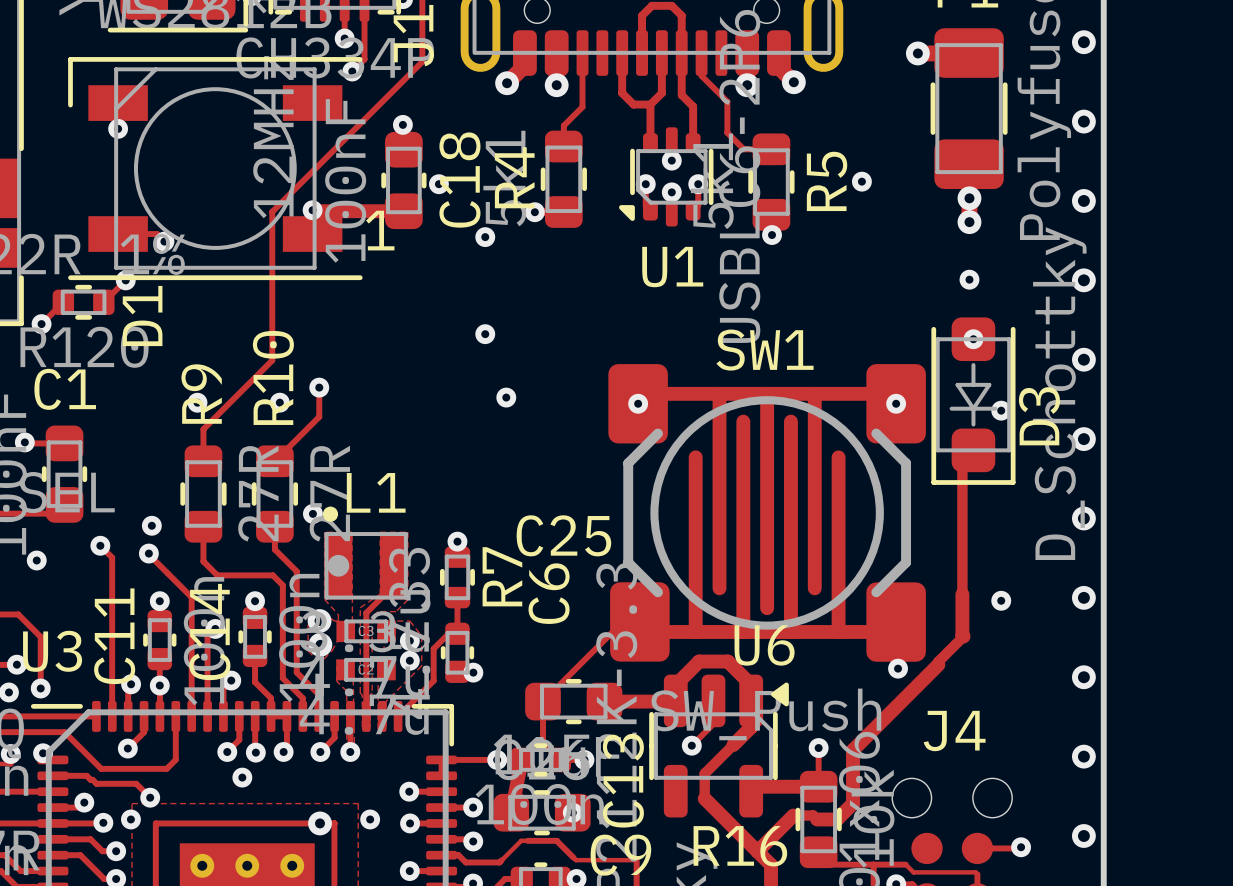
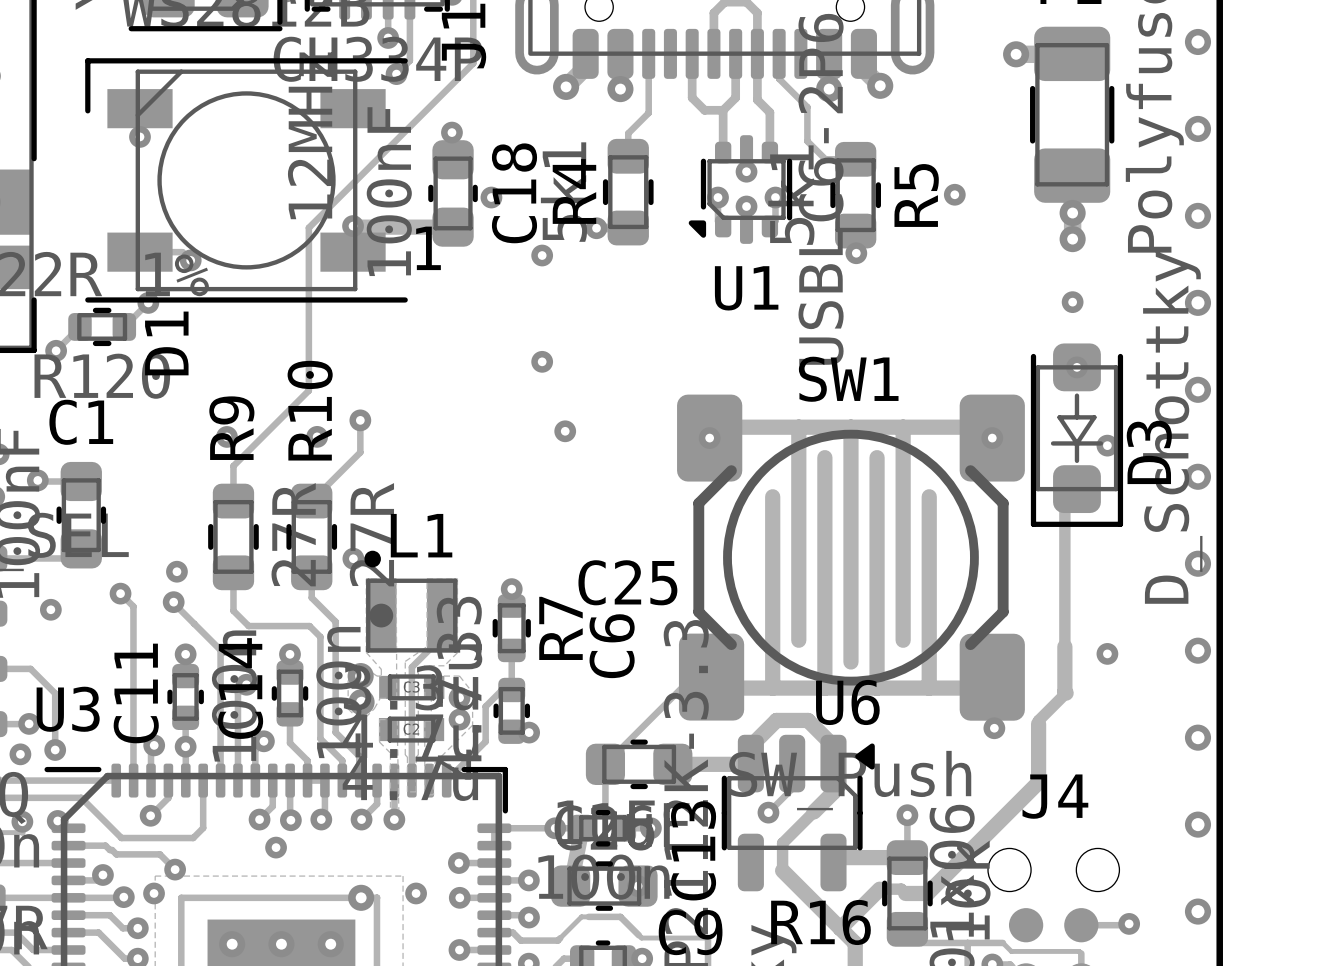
track: (938, 664) (852, 750) (852, 803) -> (1038, 723) (1038, 782) (945, 876)

